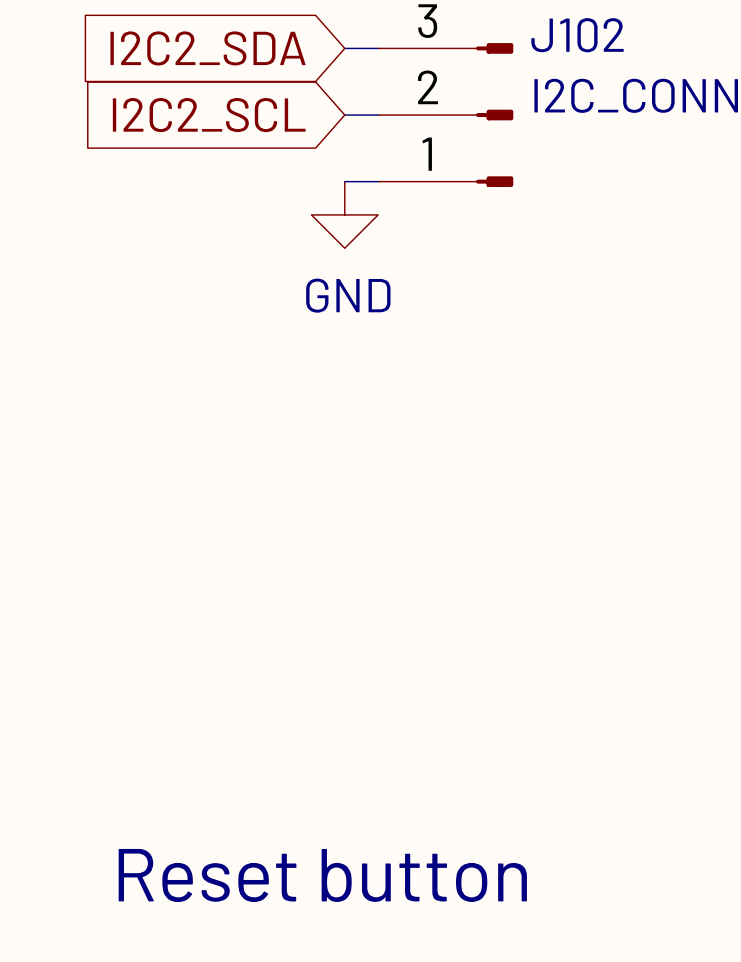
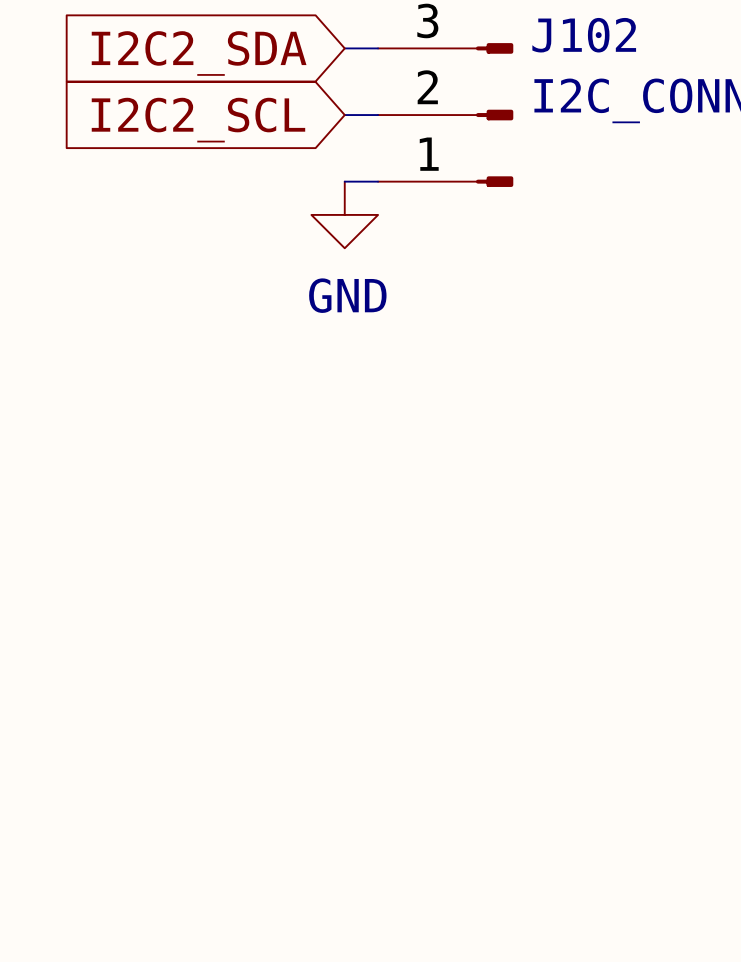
text: Reset button (322, 875) -> none

